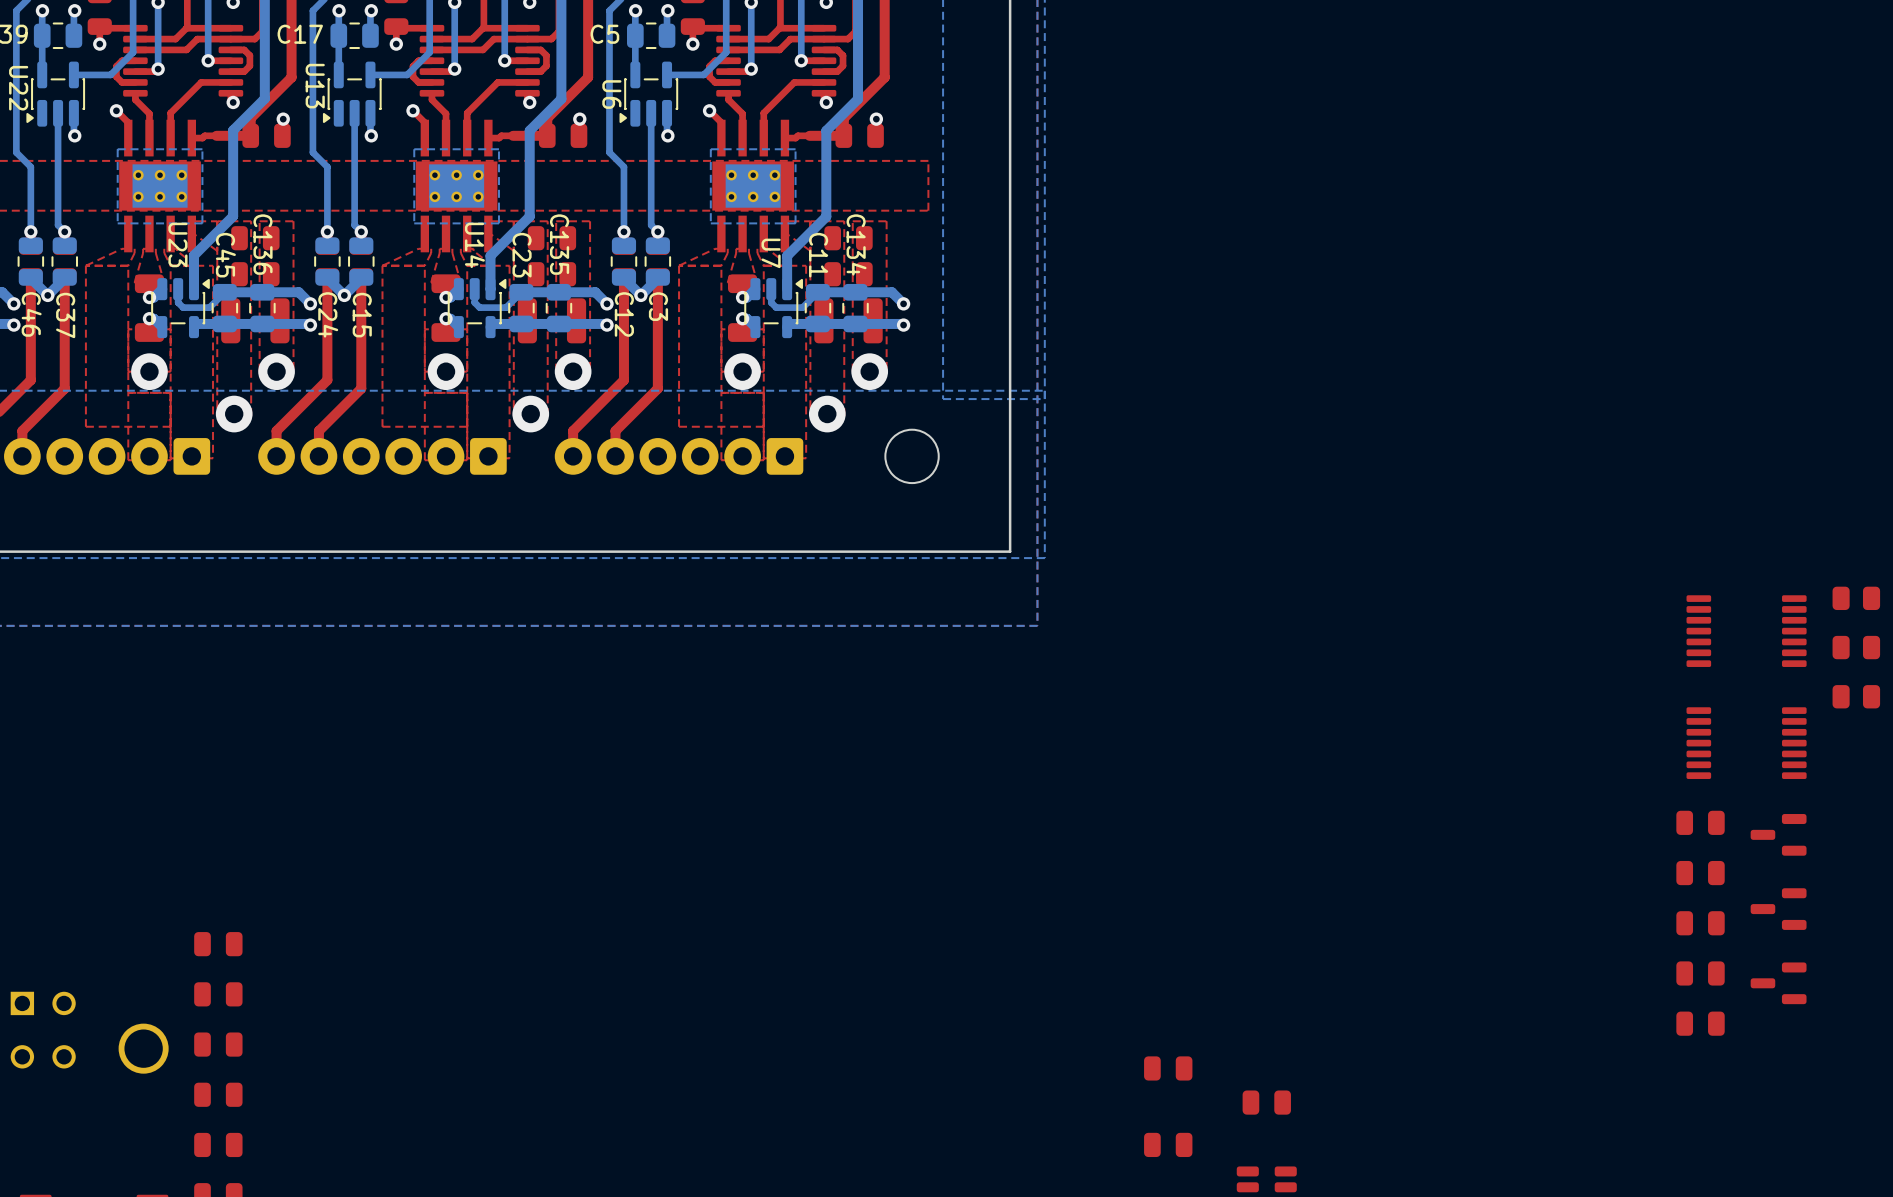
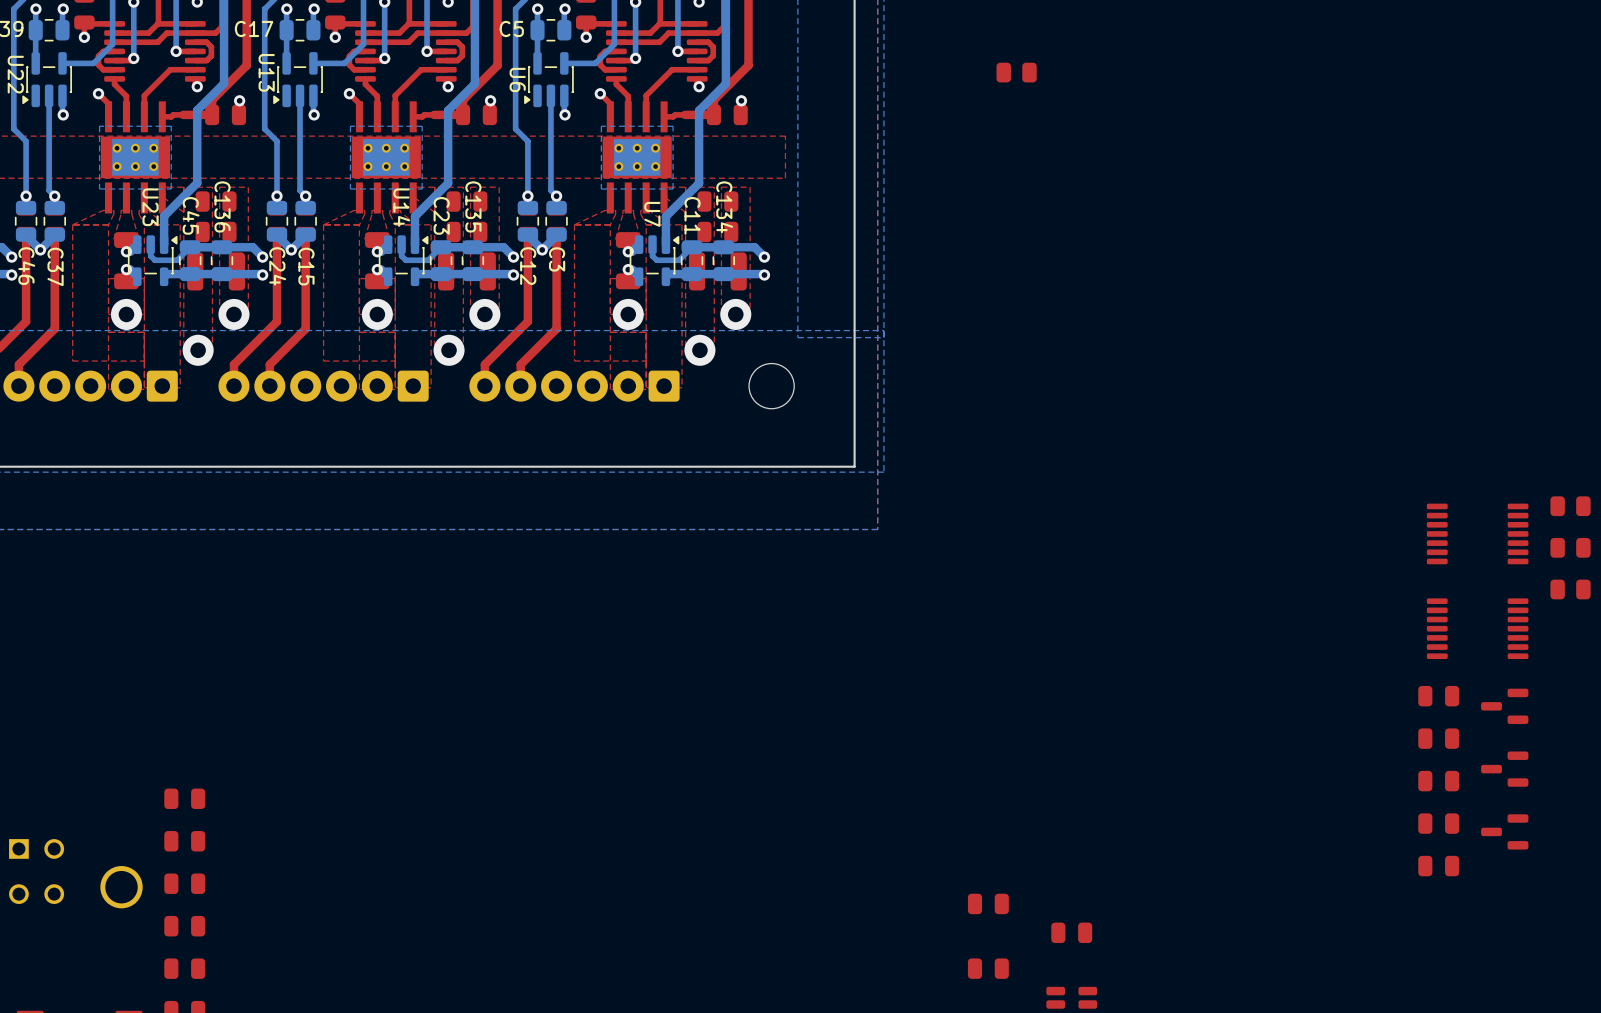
part: none -> (1016, 72)

